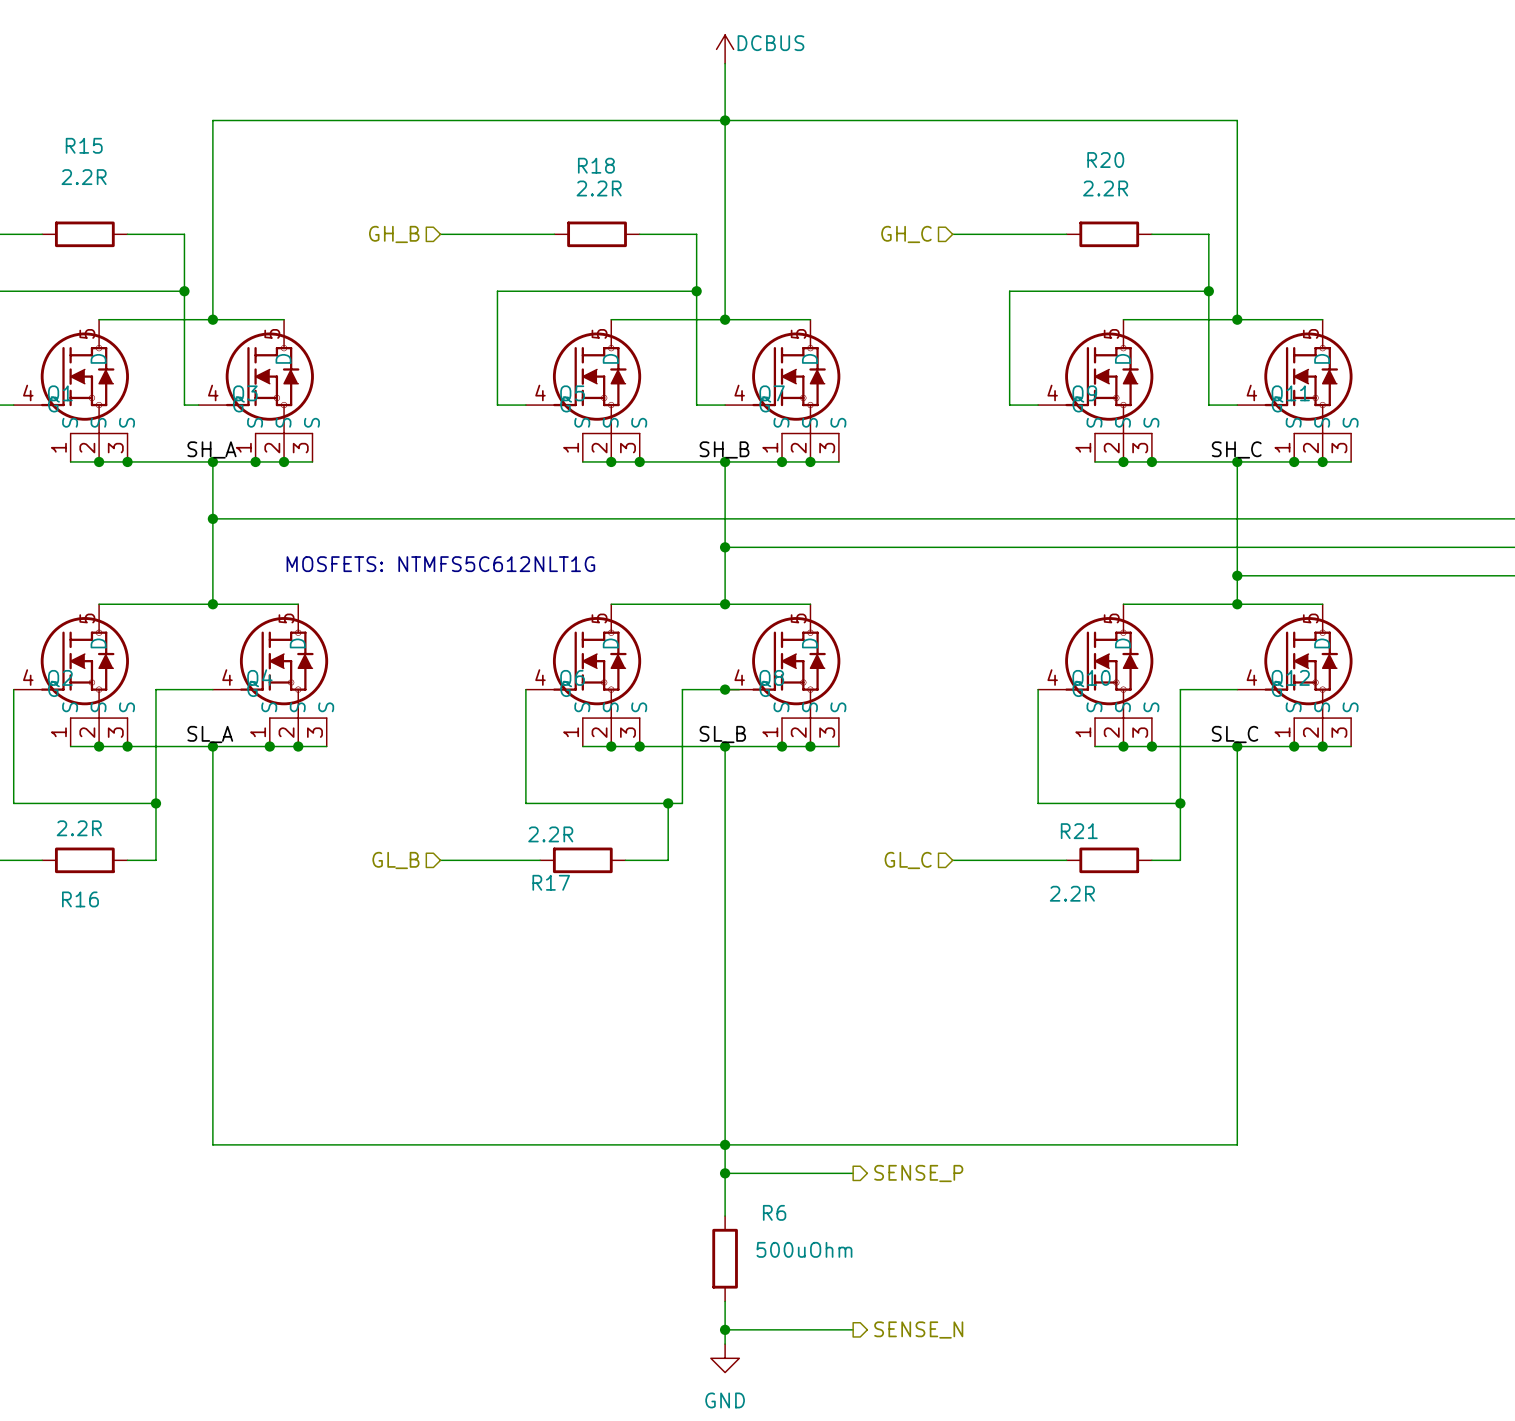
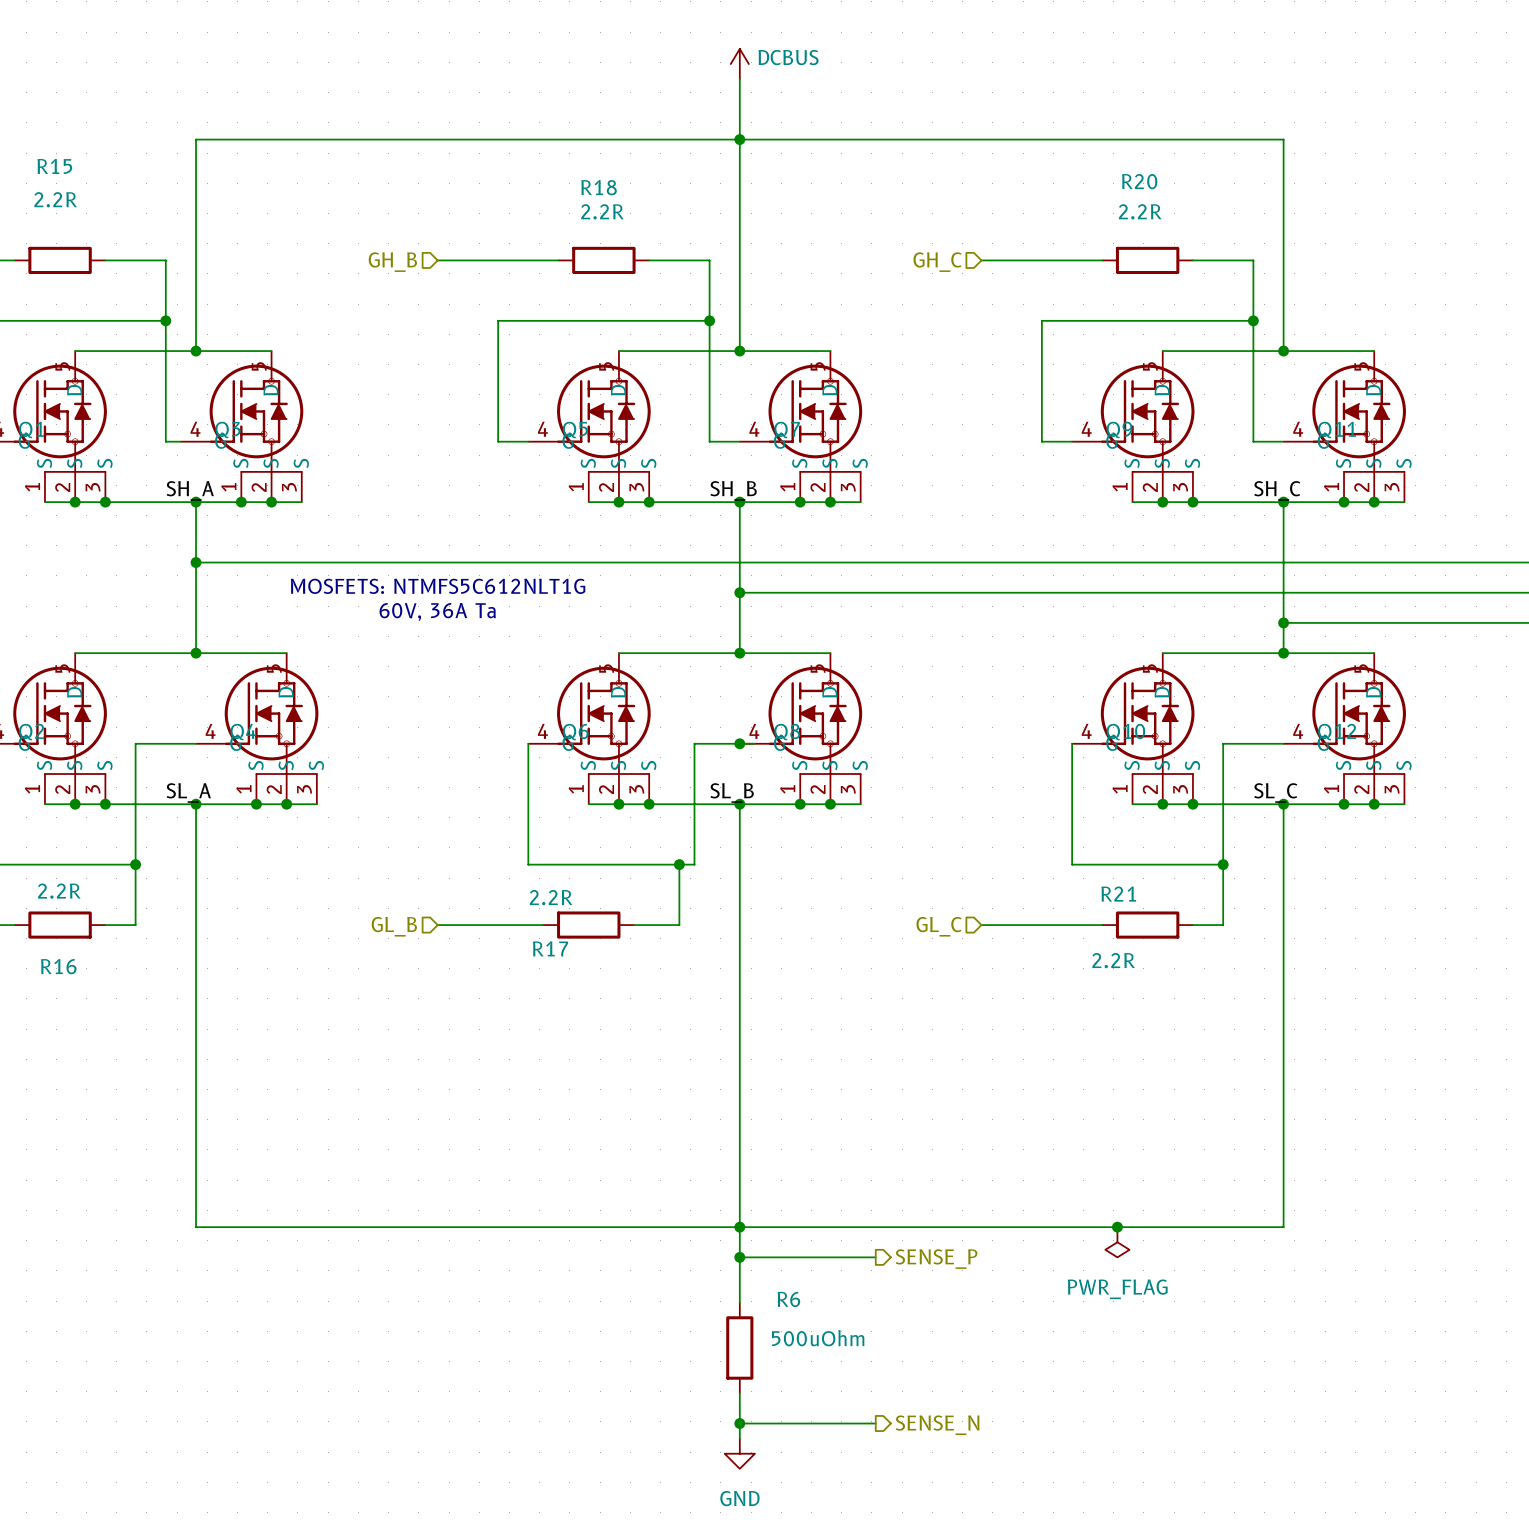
text: none -> MOSFETS: NTMFS5C612NLT1G (438, 586)
text: MOSFETS: NTMFS5C612NLT1G (440, 564) -> 60V, 36A Ta (437, 612)
junction: none -> (1117, 1227)
power symbol: none -> PWR_FLAG (1117, 1242)

